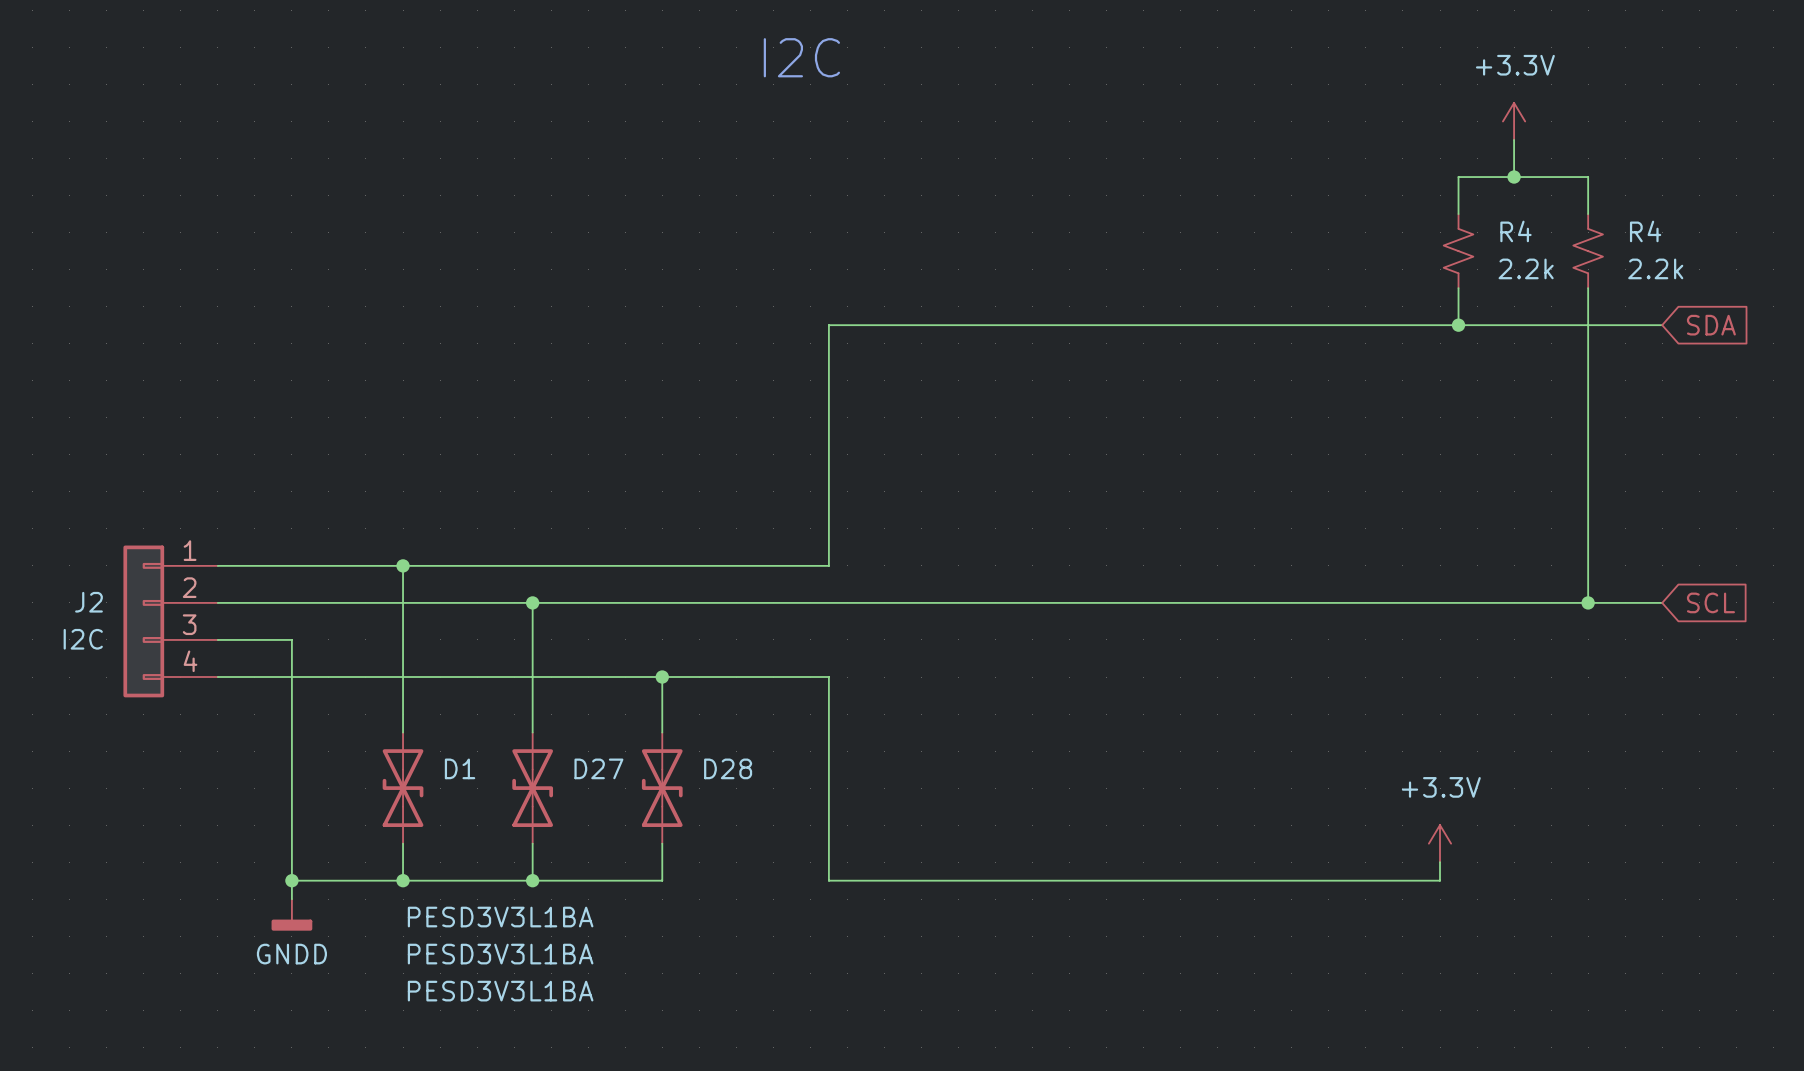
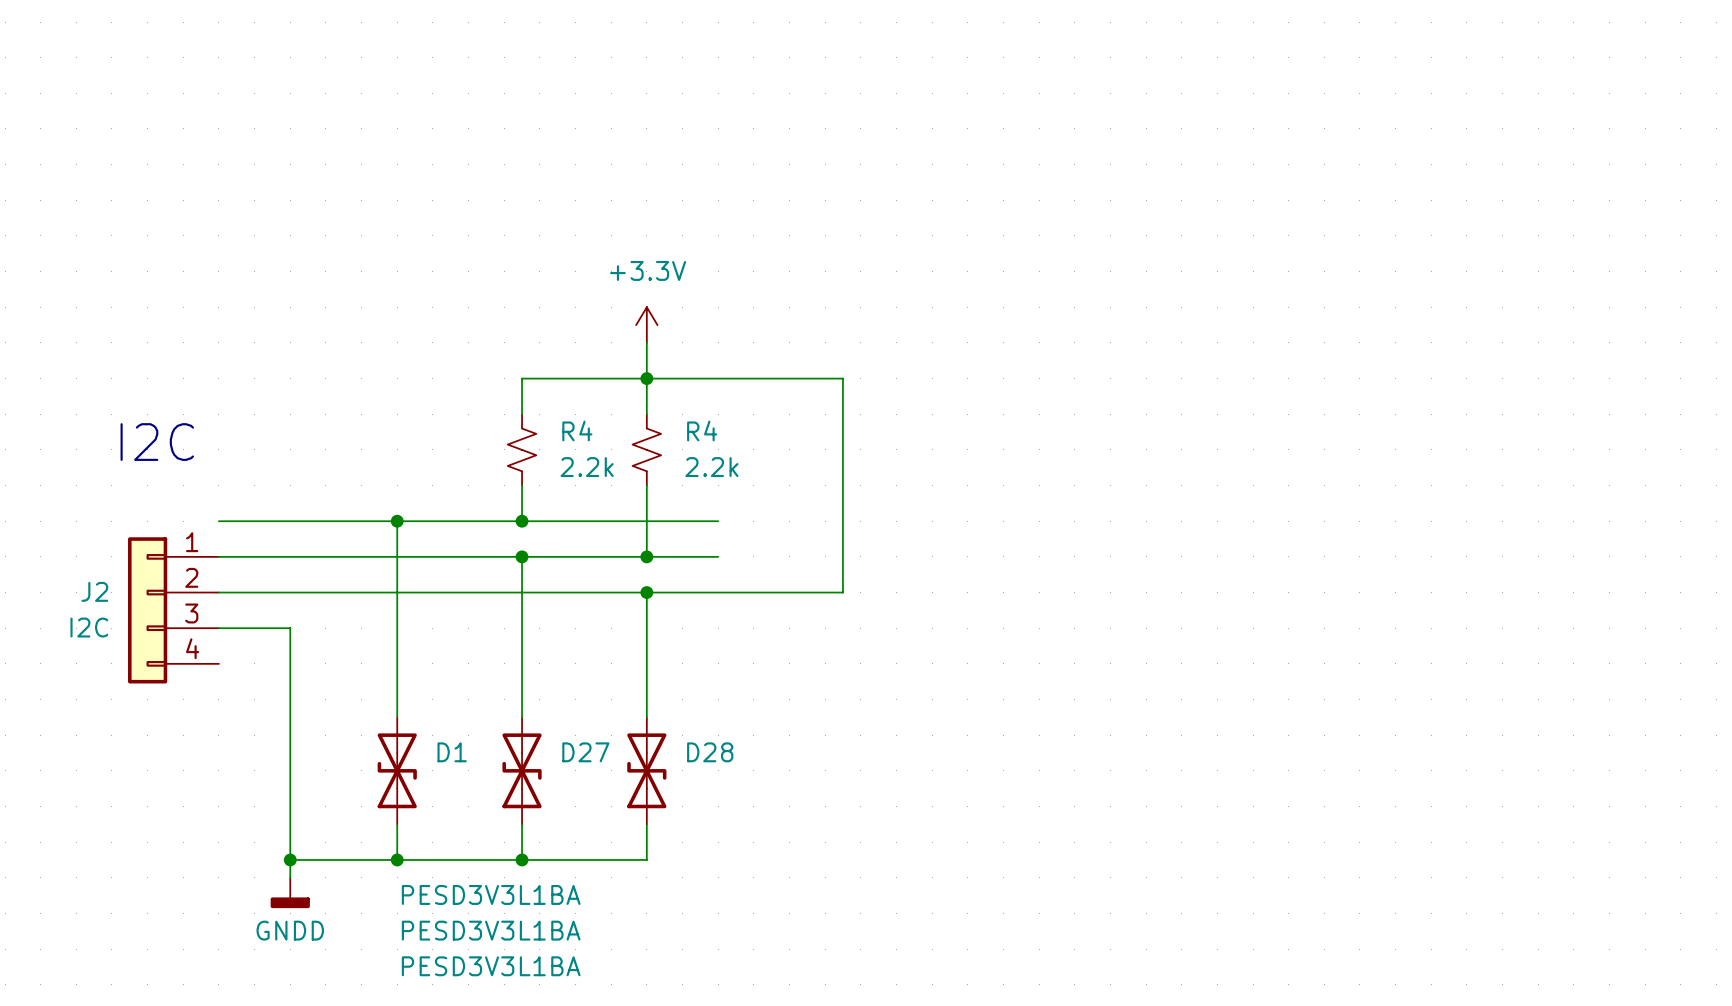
text: I2C (801, 57) -> none
power symbol: +3.3V (1514, 121) -> none
wire: (1514, 139) (1514, 177) -> none
junction: (1514, 177) -> none
wire: (1458, 214) (1458, 177) (1588, 177) (1588, 214) -> none
R4: 2.2k (1458, 251) -> none
R4: 2.2k (1588, 251) -> none
wire: (1458, 288) (1458, 325) -> none
wire: (1588, 288) (1588, 602) -> none
power symbol: none -> +3.3V (646, 325)
junction: (1458, 325) -> none
wire: (1662, 325) (828, 325) (828, 565) (736, 565) -> none
global label: SDA (1711, 325) -> none
wire: none -> (646, 342) (646, 414)
junction: none -> (646, 378)
text: none -> I2C (157, 442)
R4: none -> 2.2k (522, 449)
R4: none -> 2.2k (646, 449)
wire: none -> (522, 485) (522, 521)
wire: none -> (646, 485) (646, 556)
wire: none -> (218, 521) (718, 521)
wire: none -> (397, 521) (397, 556)
junction: none -> (522, 521)
junction position: (403, 565) -> (397, 521)
wire: none -> (522, 556) (522, 592)
junction: none -> (522, 556)
junction: none -> (646, 556)
junction: (532, 602) -> none
wire: none -> (646, 592) (646, 663)
junction: none -> (646, 592)
wire: (865, 602) (1662, 602) -> (842, 592) (842, 378) (522, 378) (522, 414)
junction: (1588, 602) -> none
global label: SCL (1710, 602) -> none
wire: (217, 677) (828, 677) (828, 880) (1440, 880) (1440, 862) -> none
junction: (662, 677) -> none
power symbol: +3.3V (1440, 843) -> none

